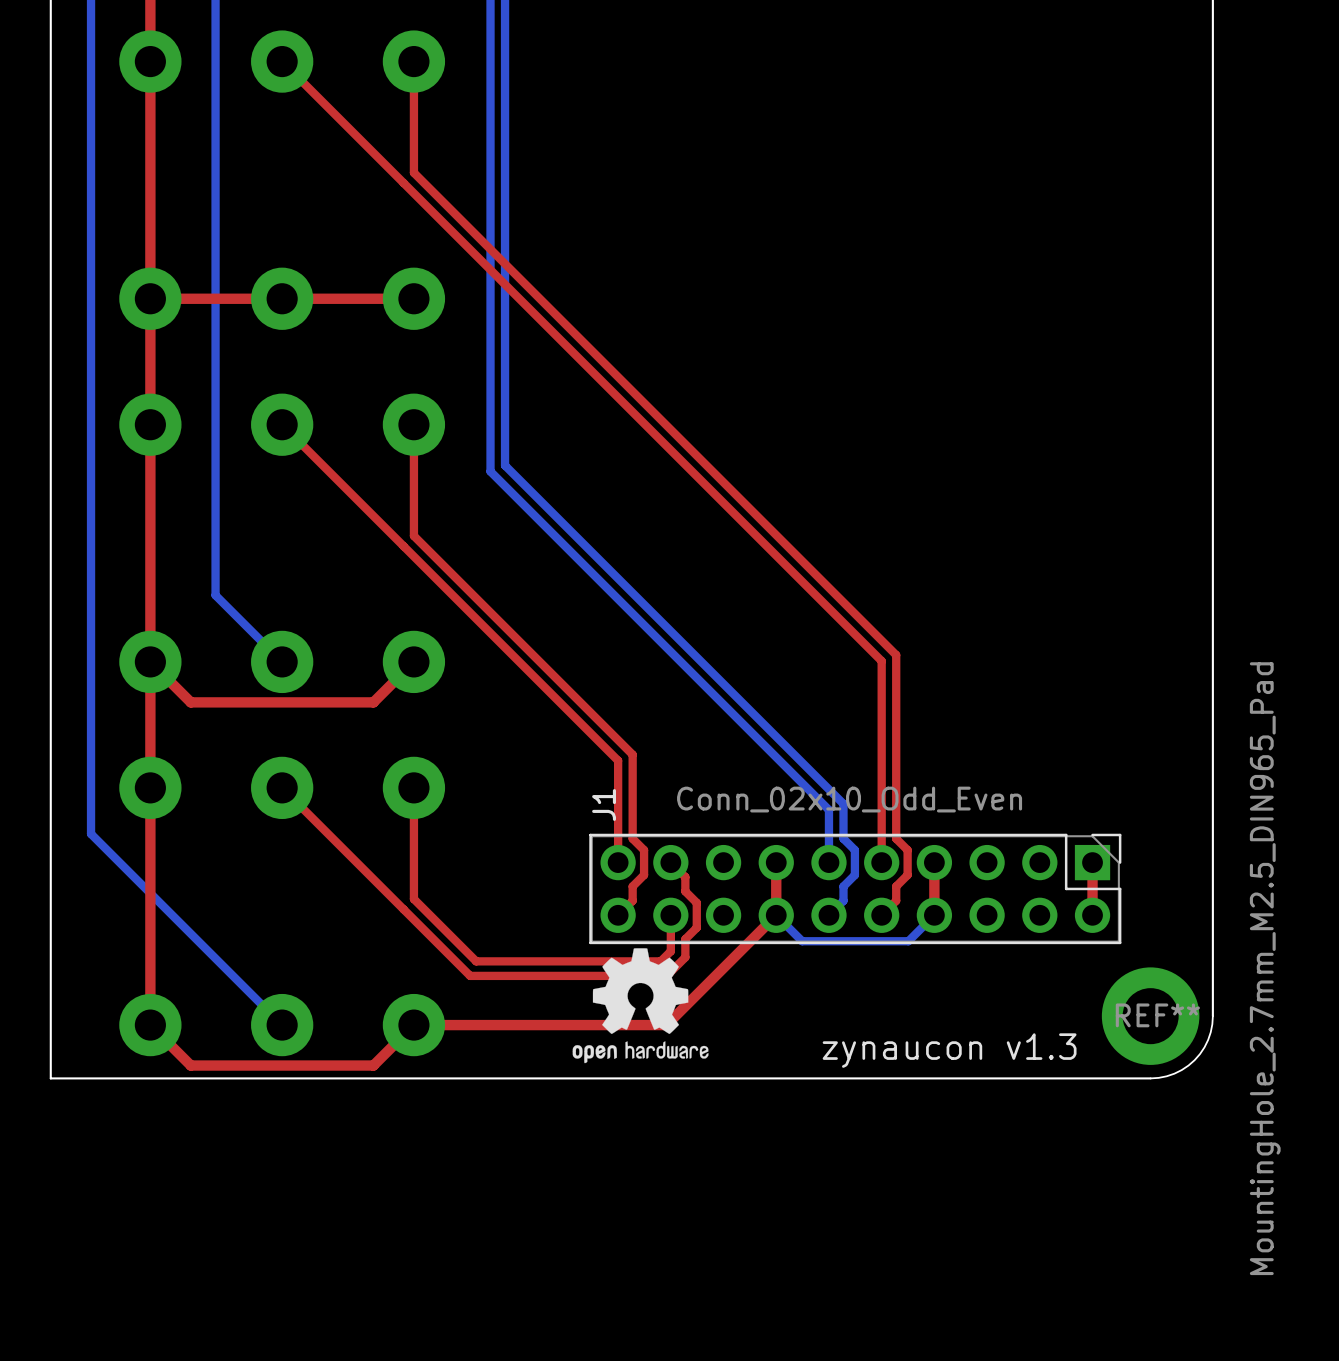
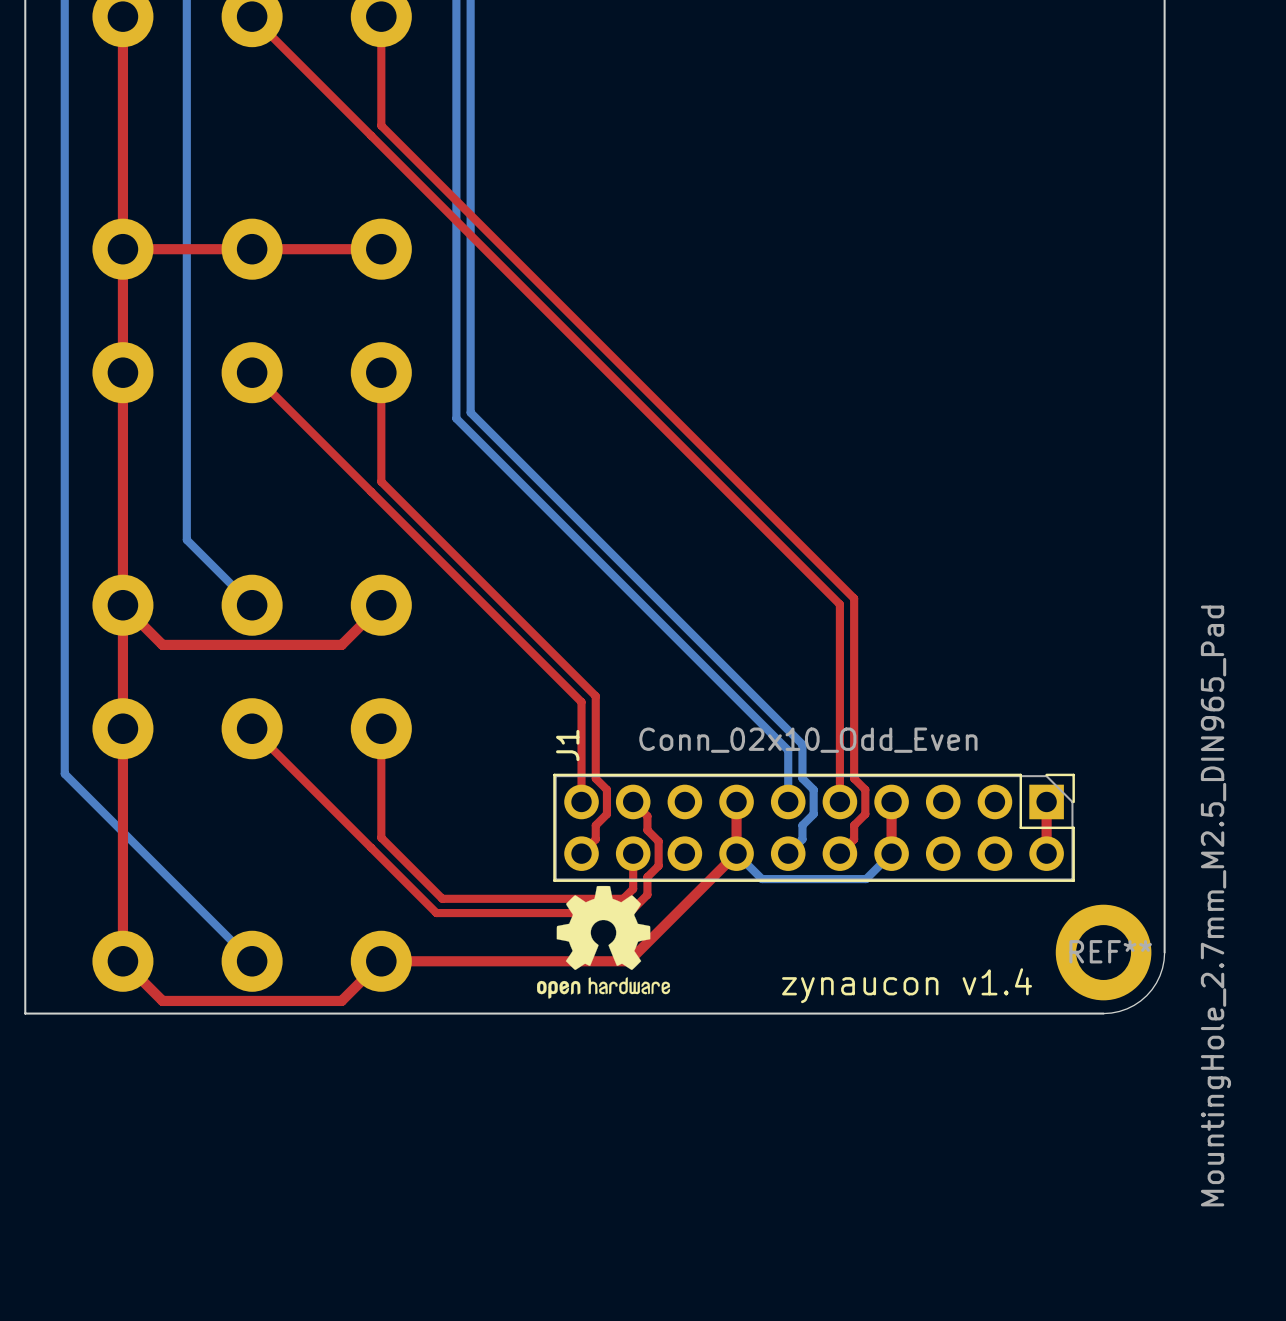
text: zynaucon v1.3 (949, 1050) -> zynaucon v1.4 (907, 985)

